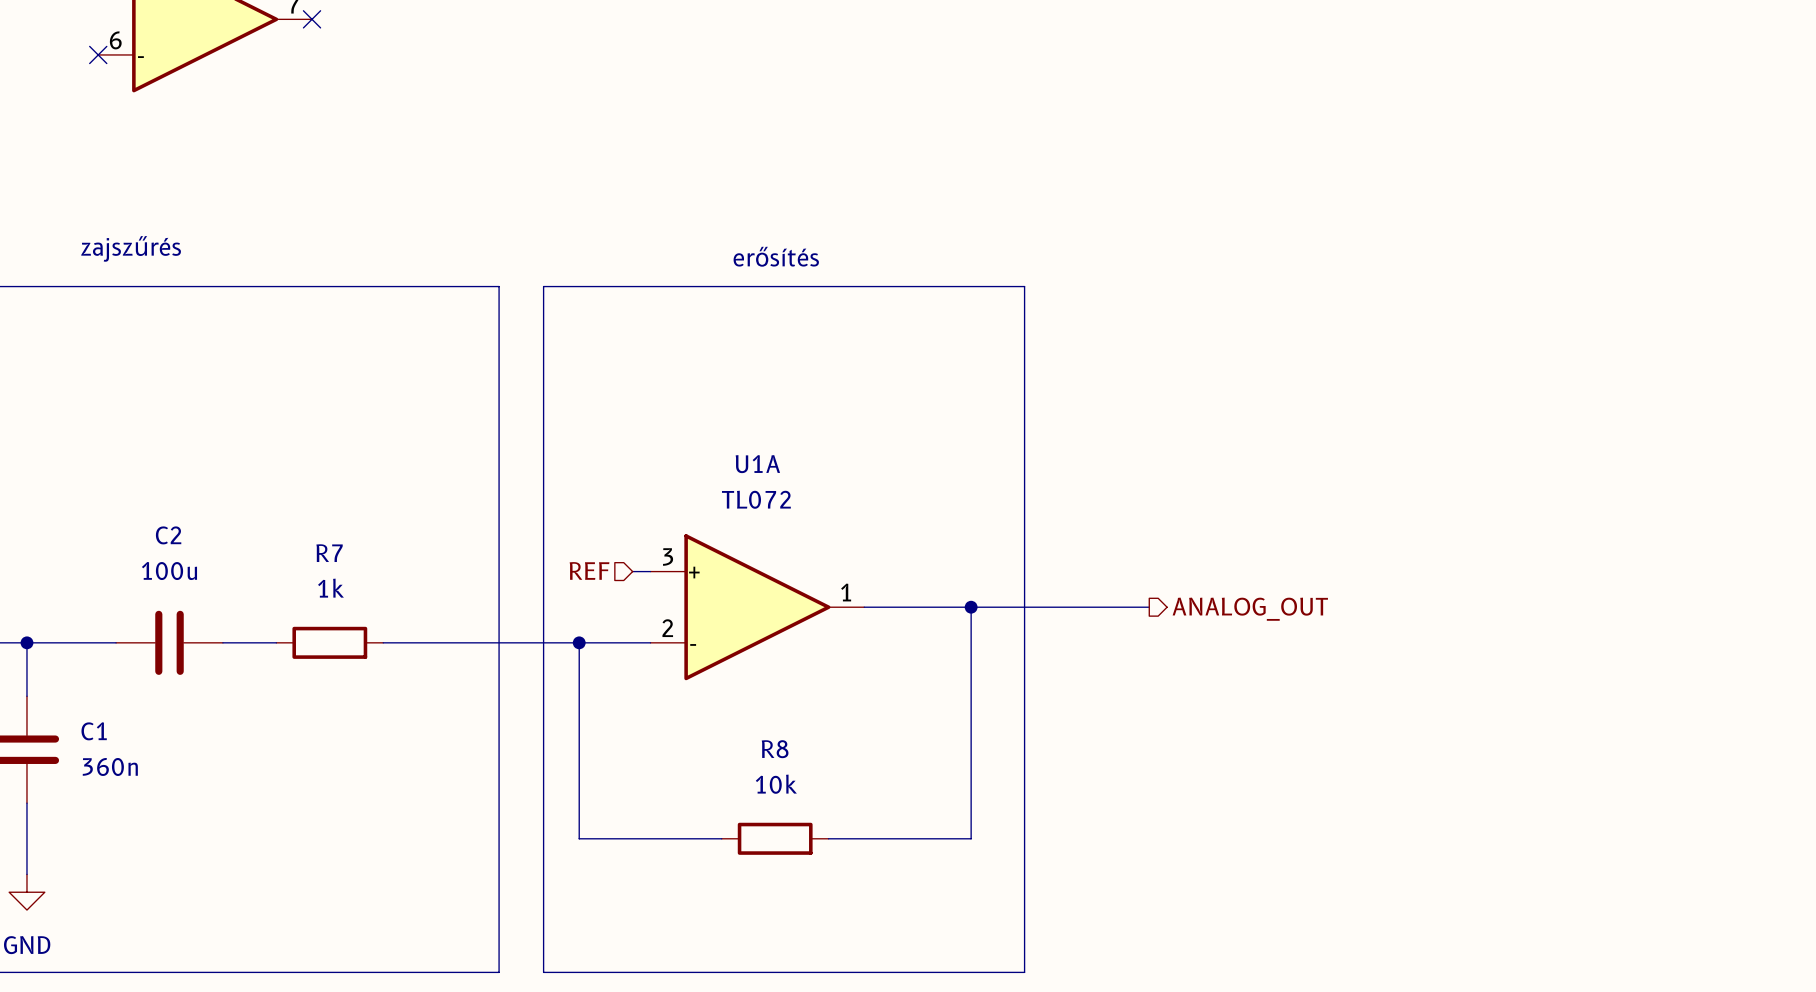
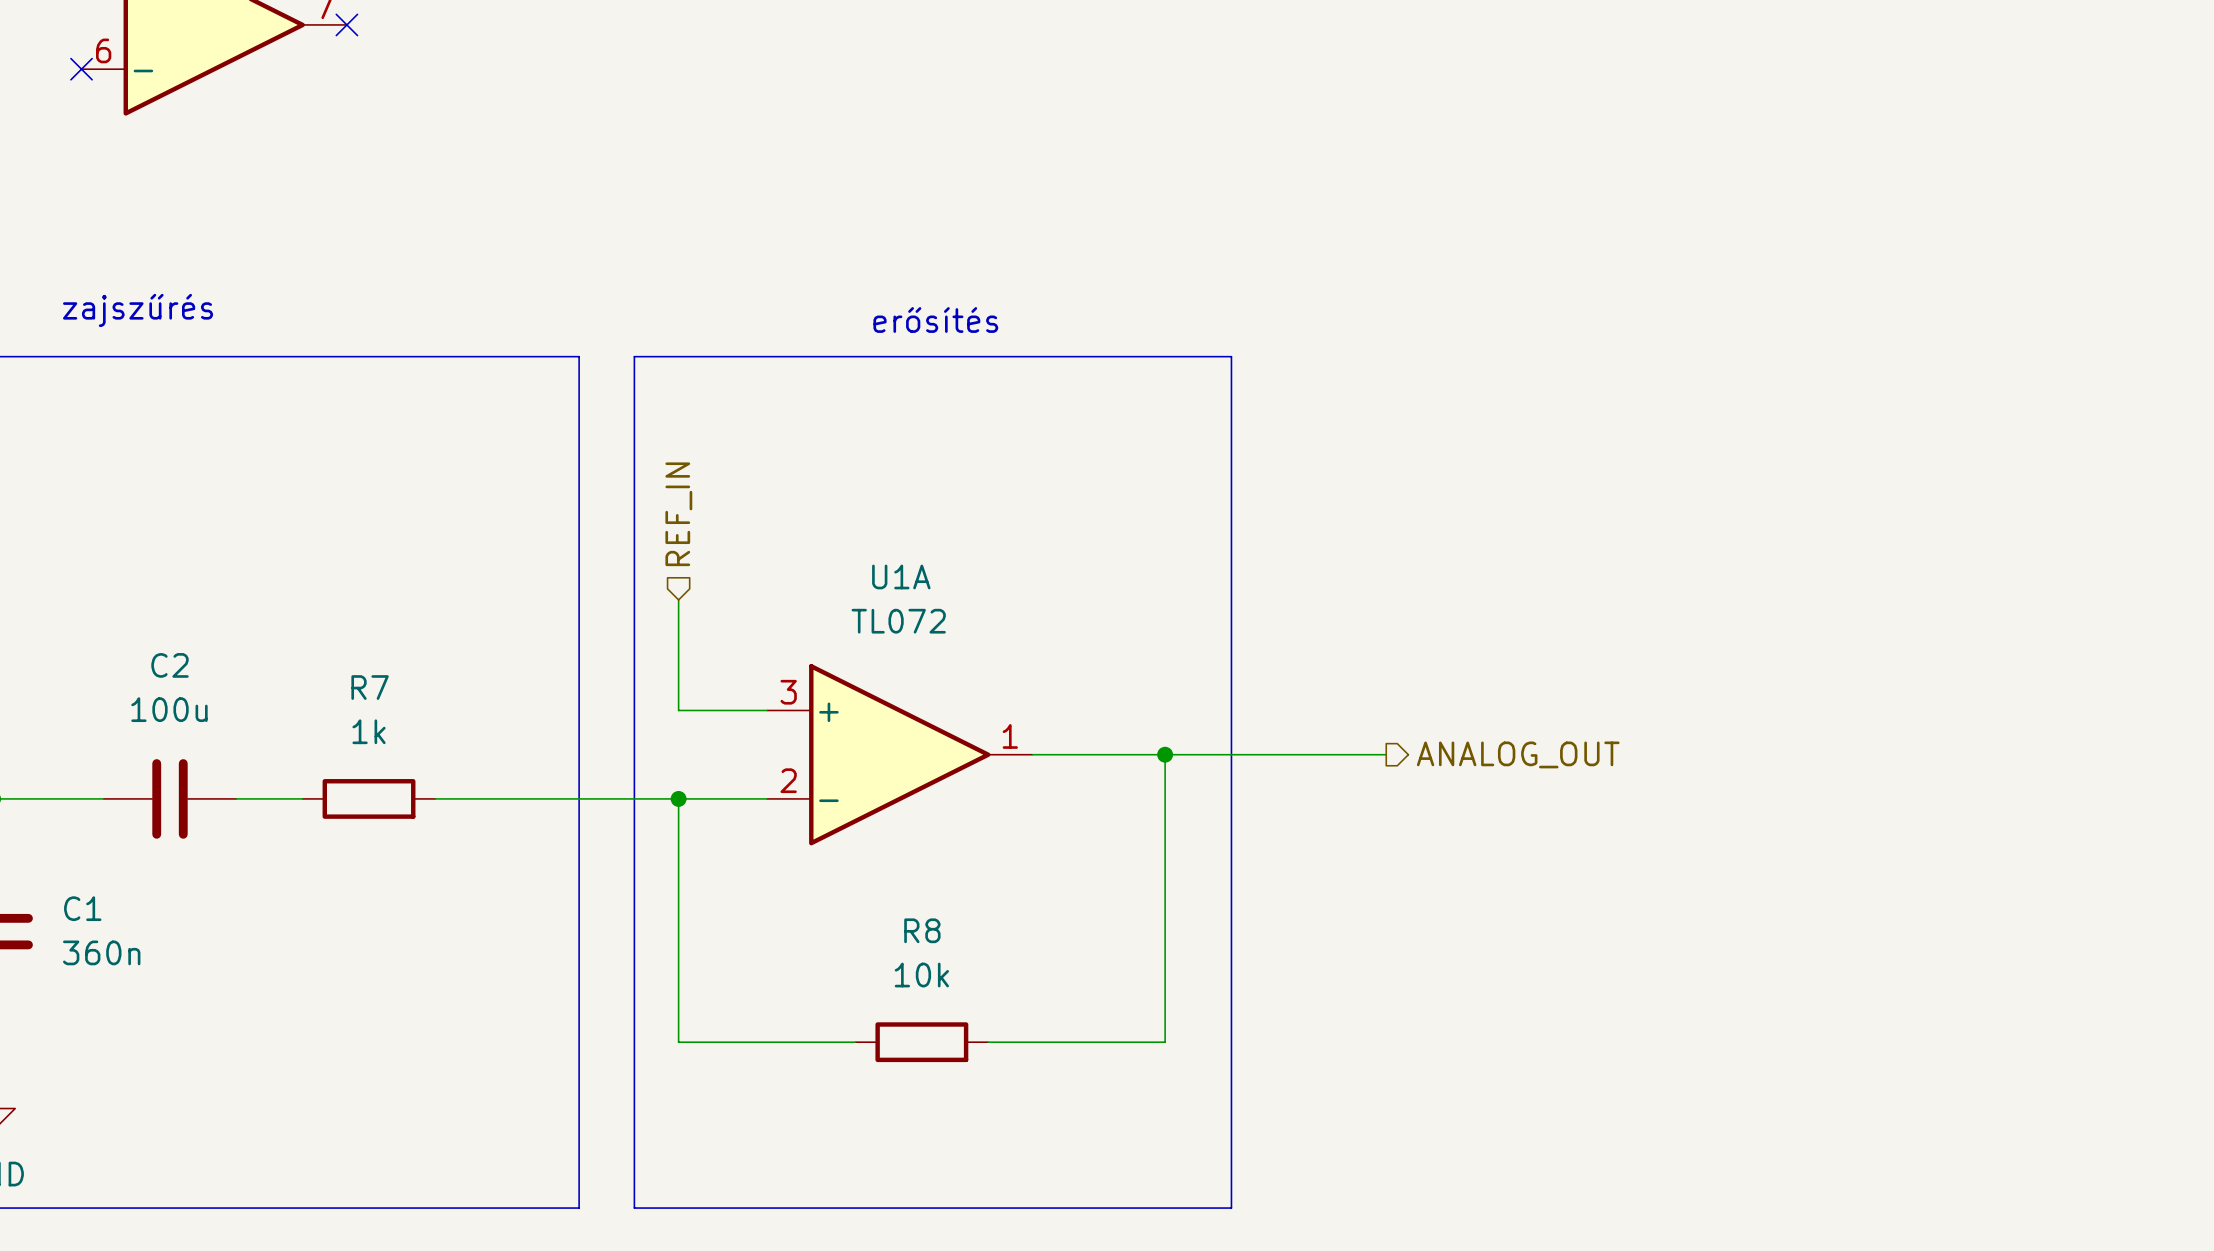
hierarchical label: none -> REF_IN (678, 514)
wire: none -> (678, 599) (678, 710) (744, 710)
hierarchical label: REF (589, 570) -> none

